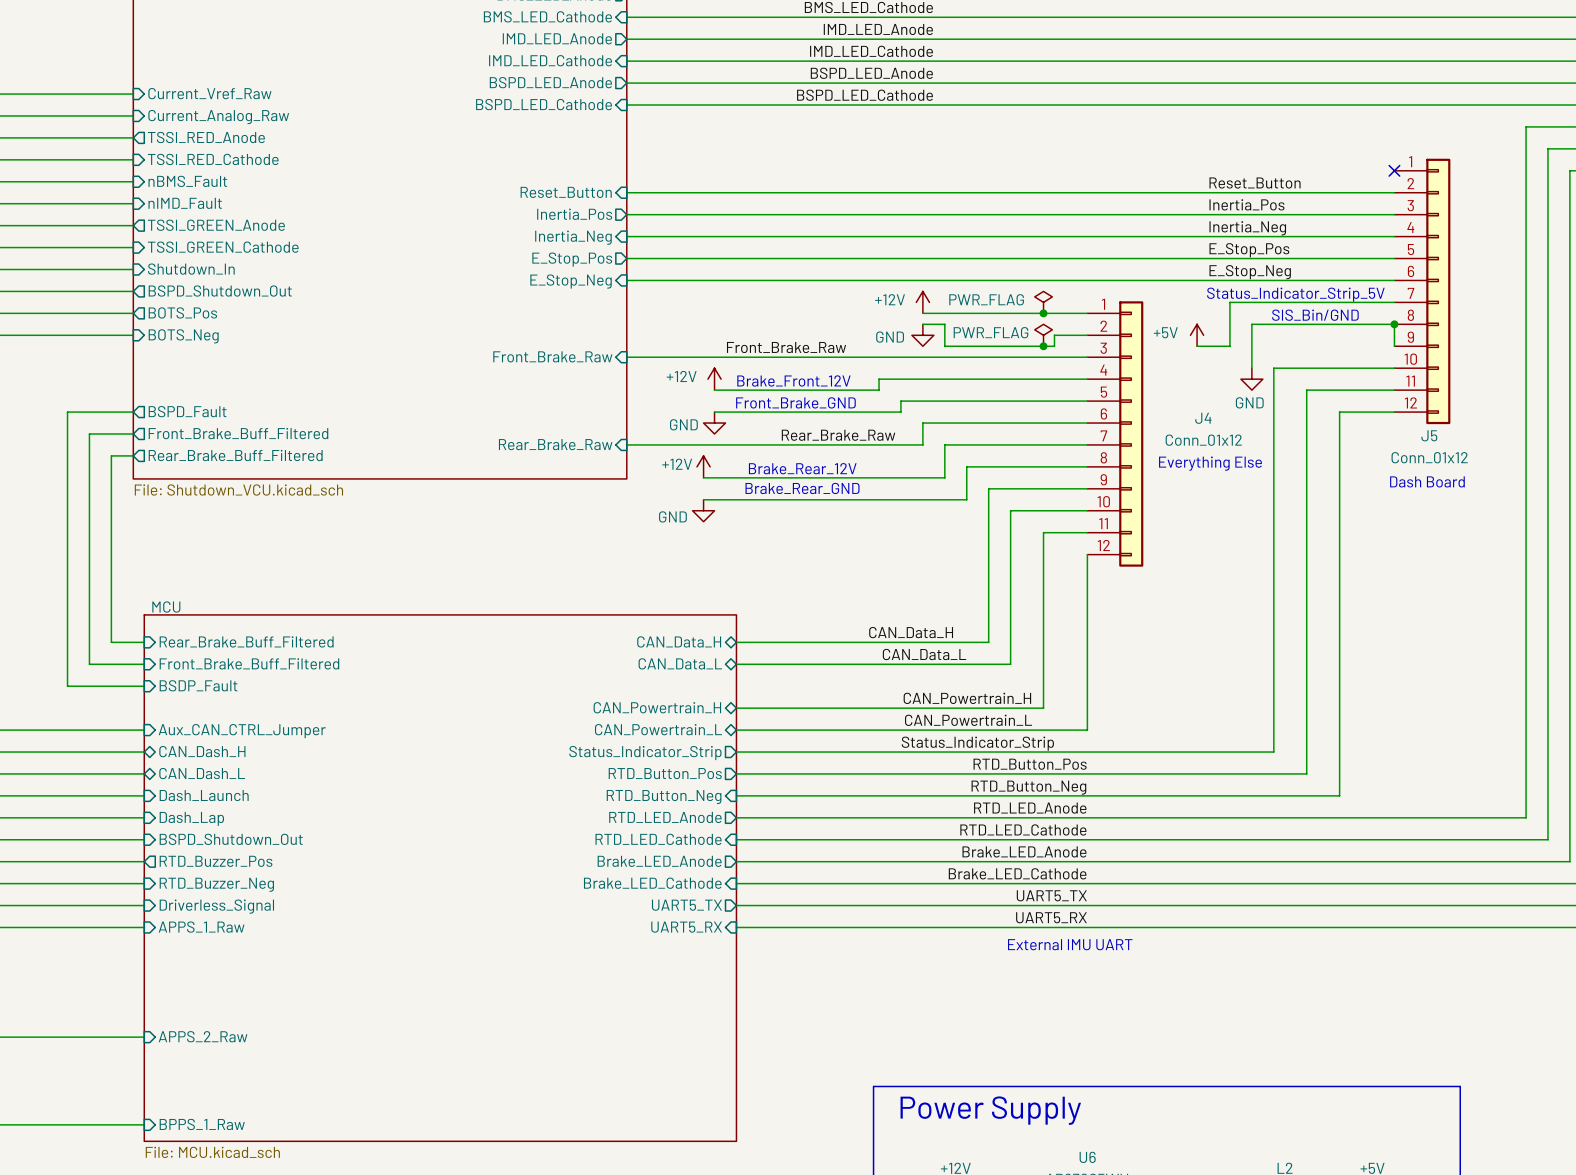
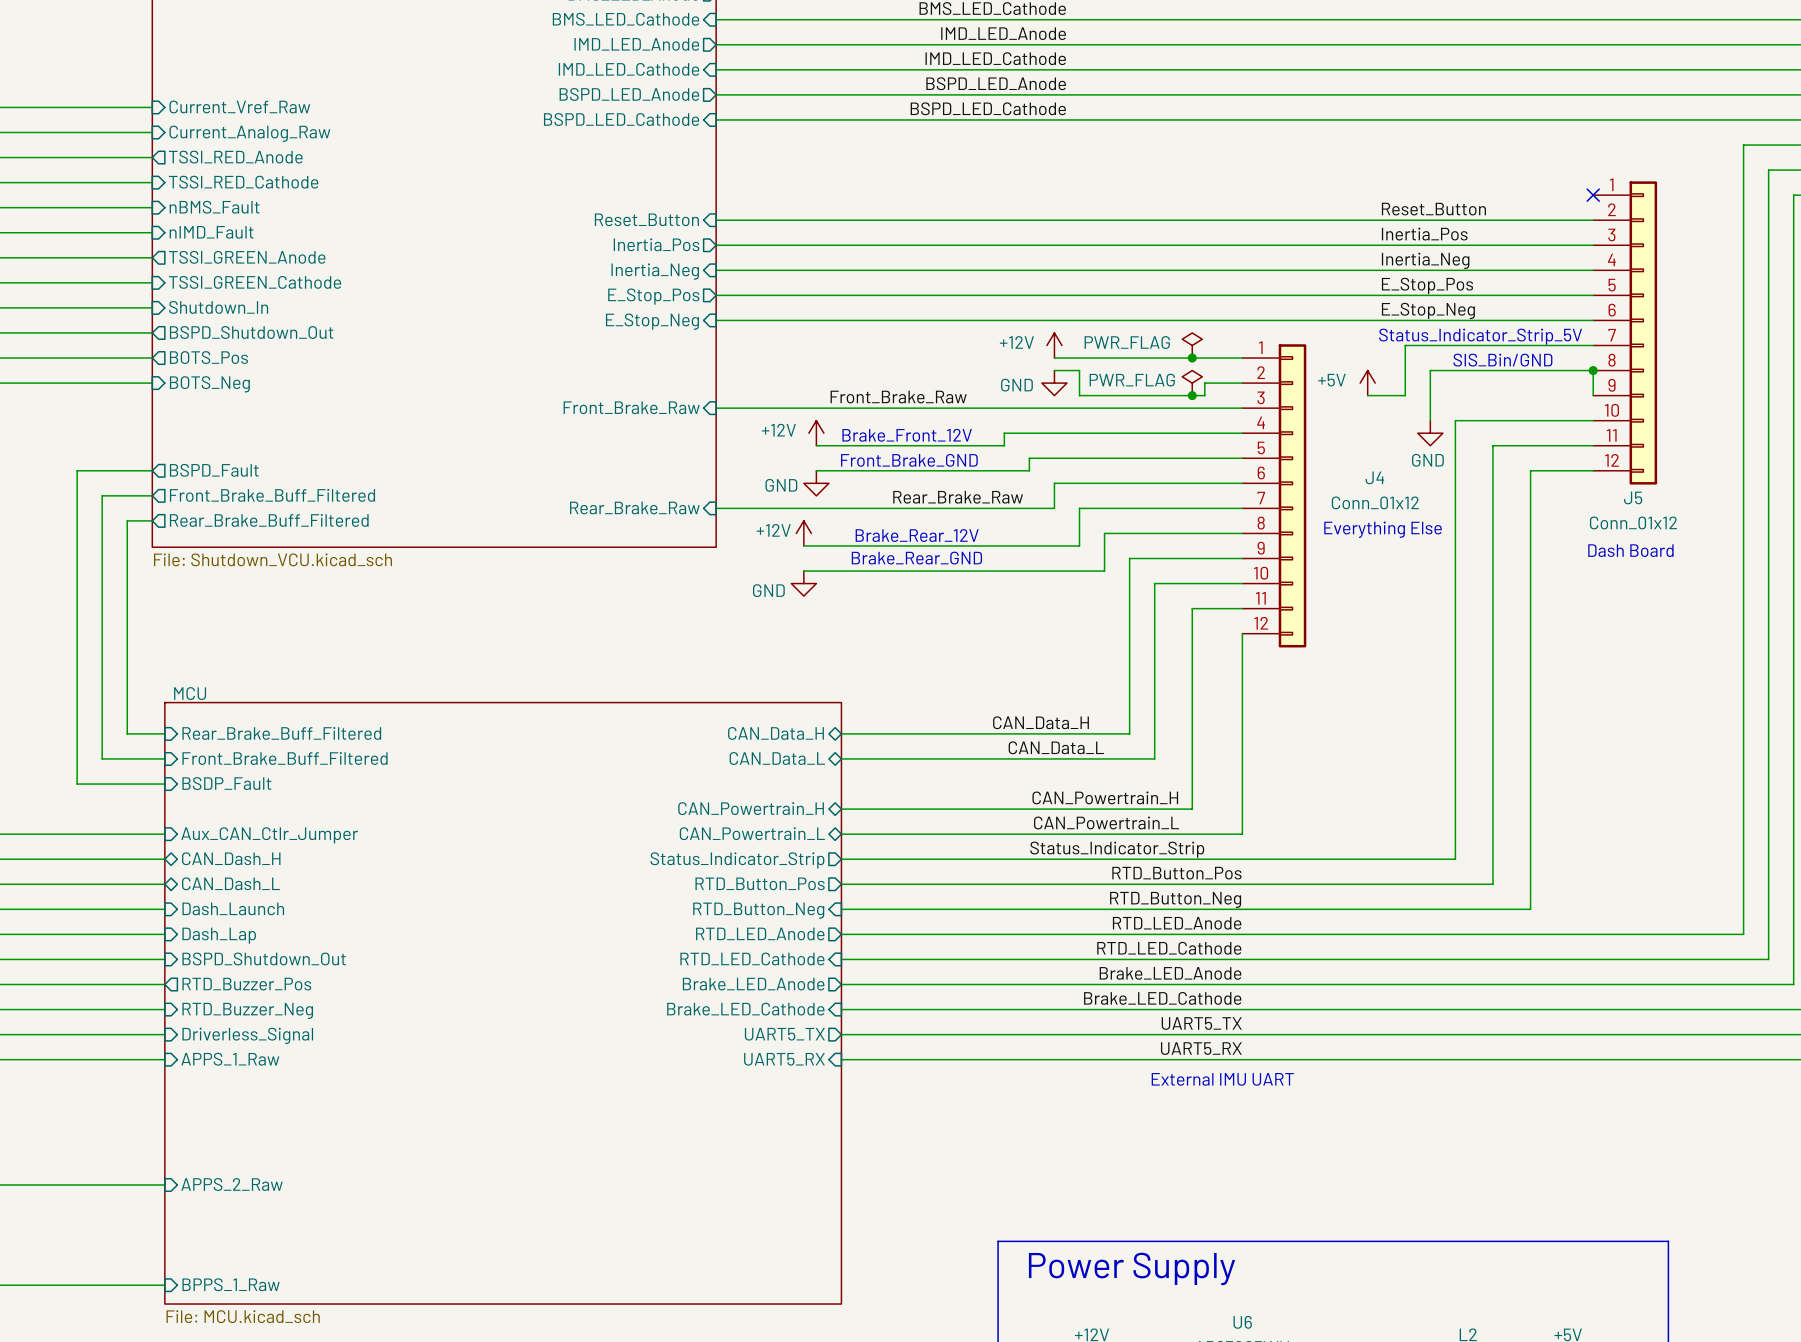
sheet pin: Aux_CAN_CTRL_Jumper (242, 731) -> Aux_CAN_Ctlr_Jumper (269, 835)

